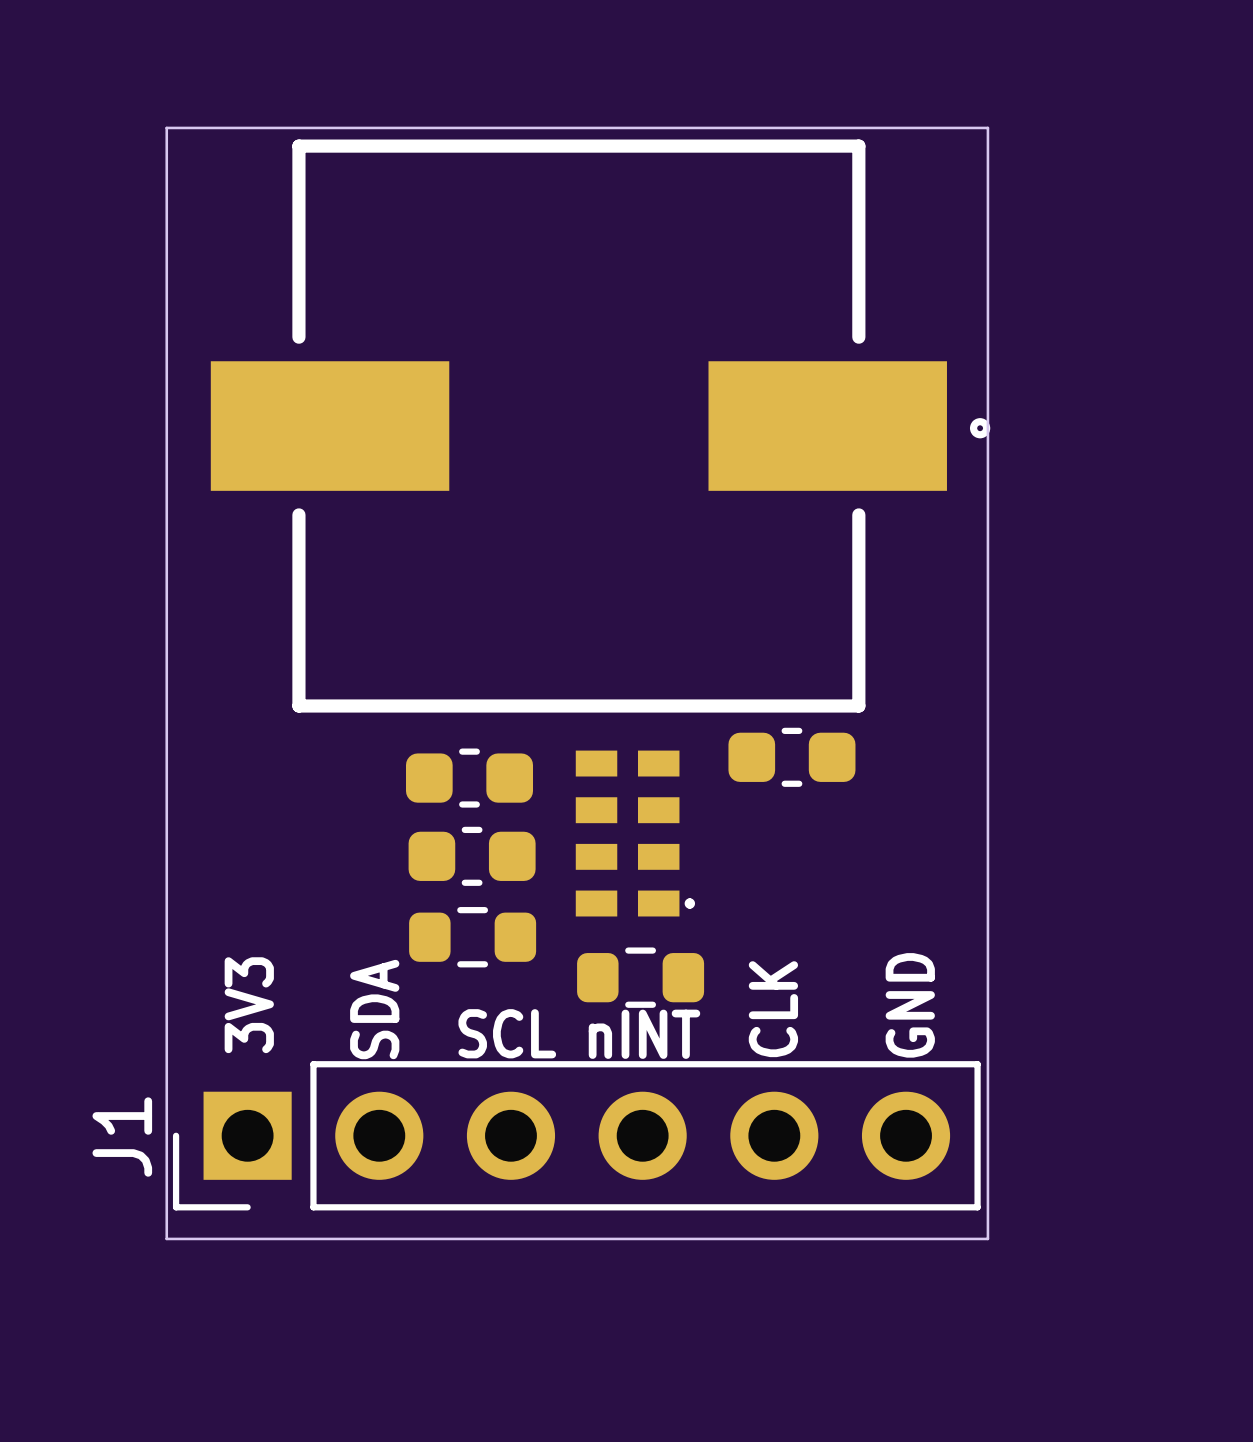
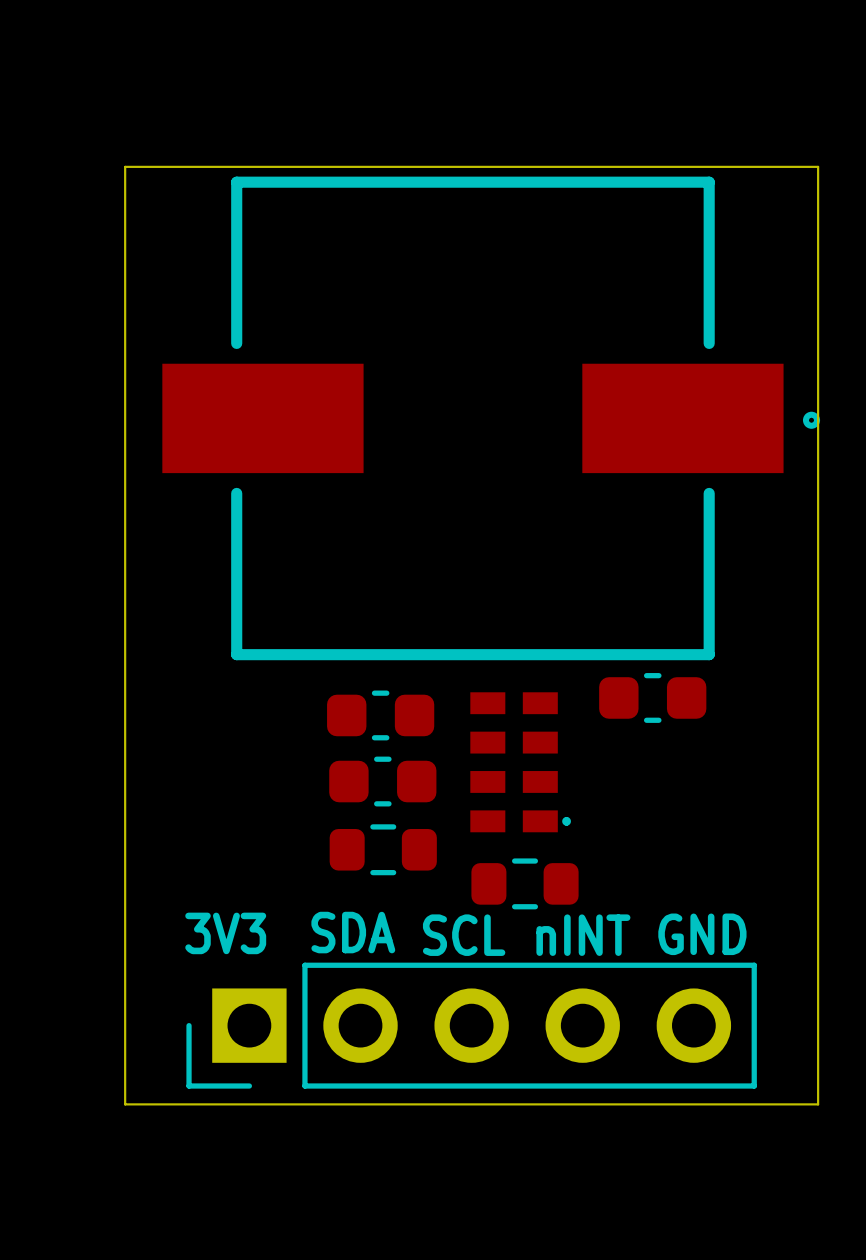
text rotation: 0° (249, 1005) -> 90° clockwise (225, 933)
text: GND (910, 1005) -> none
text rotation: 0° (374, 1009) -> 90° clockwise (353, 932)
text: CLK (773, 1009) -> GND (702, 934)
text position: SCL (507, 1033) -> SCL (464, 935)
text position: nINT (644, 1034) -> nINT (583, 935)
J1: (576, 1135) -> none
part: none -> (471, 1025)

